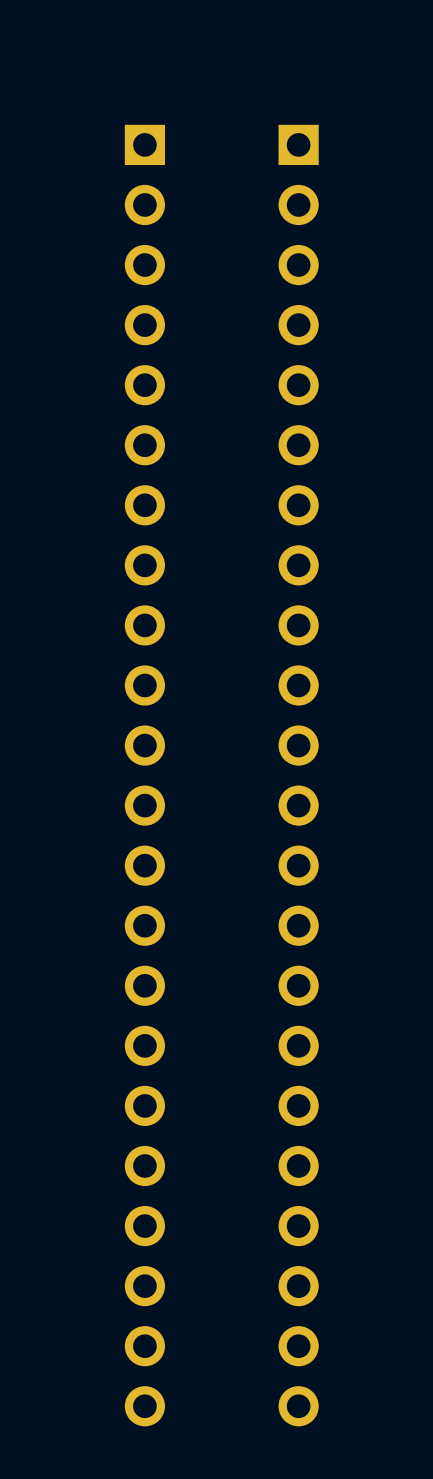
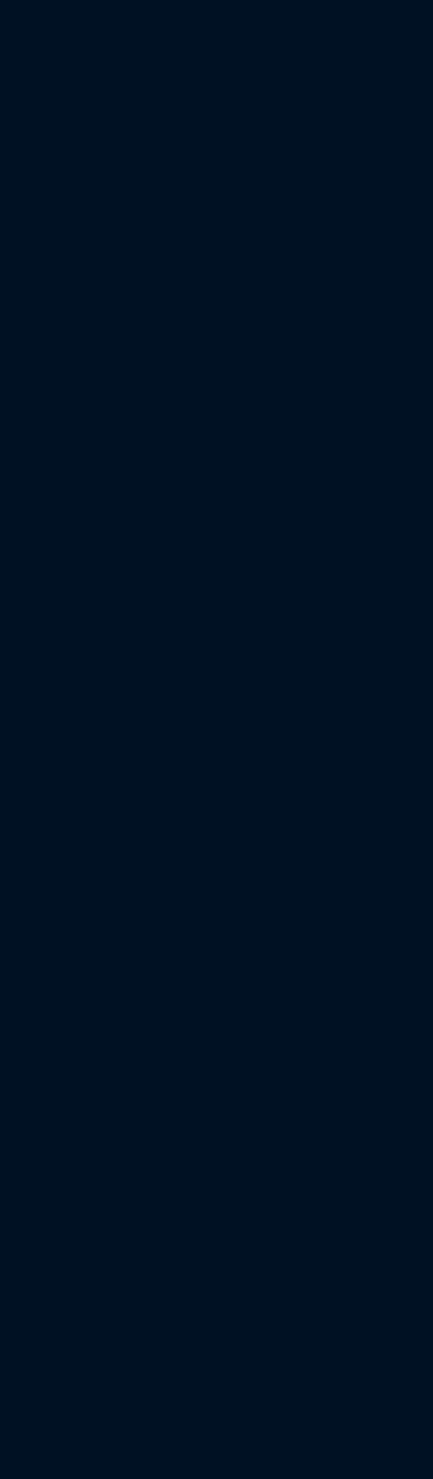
part: (144, 775) -> none
part: (298, 775) -> none

